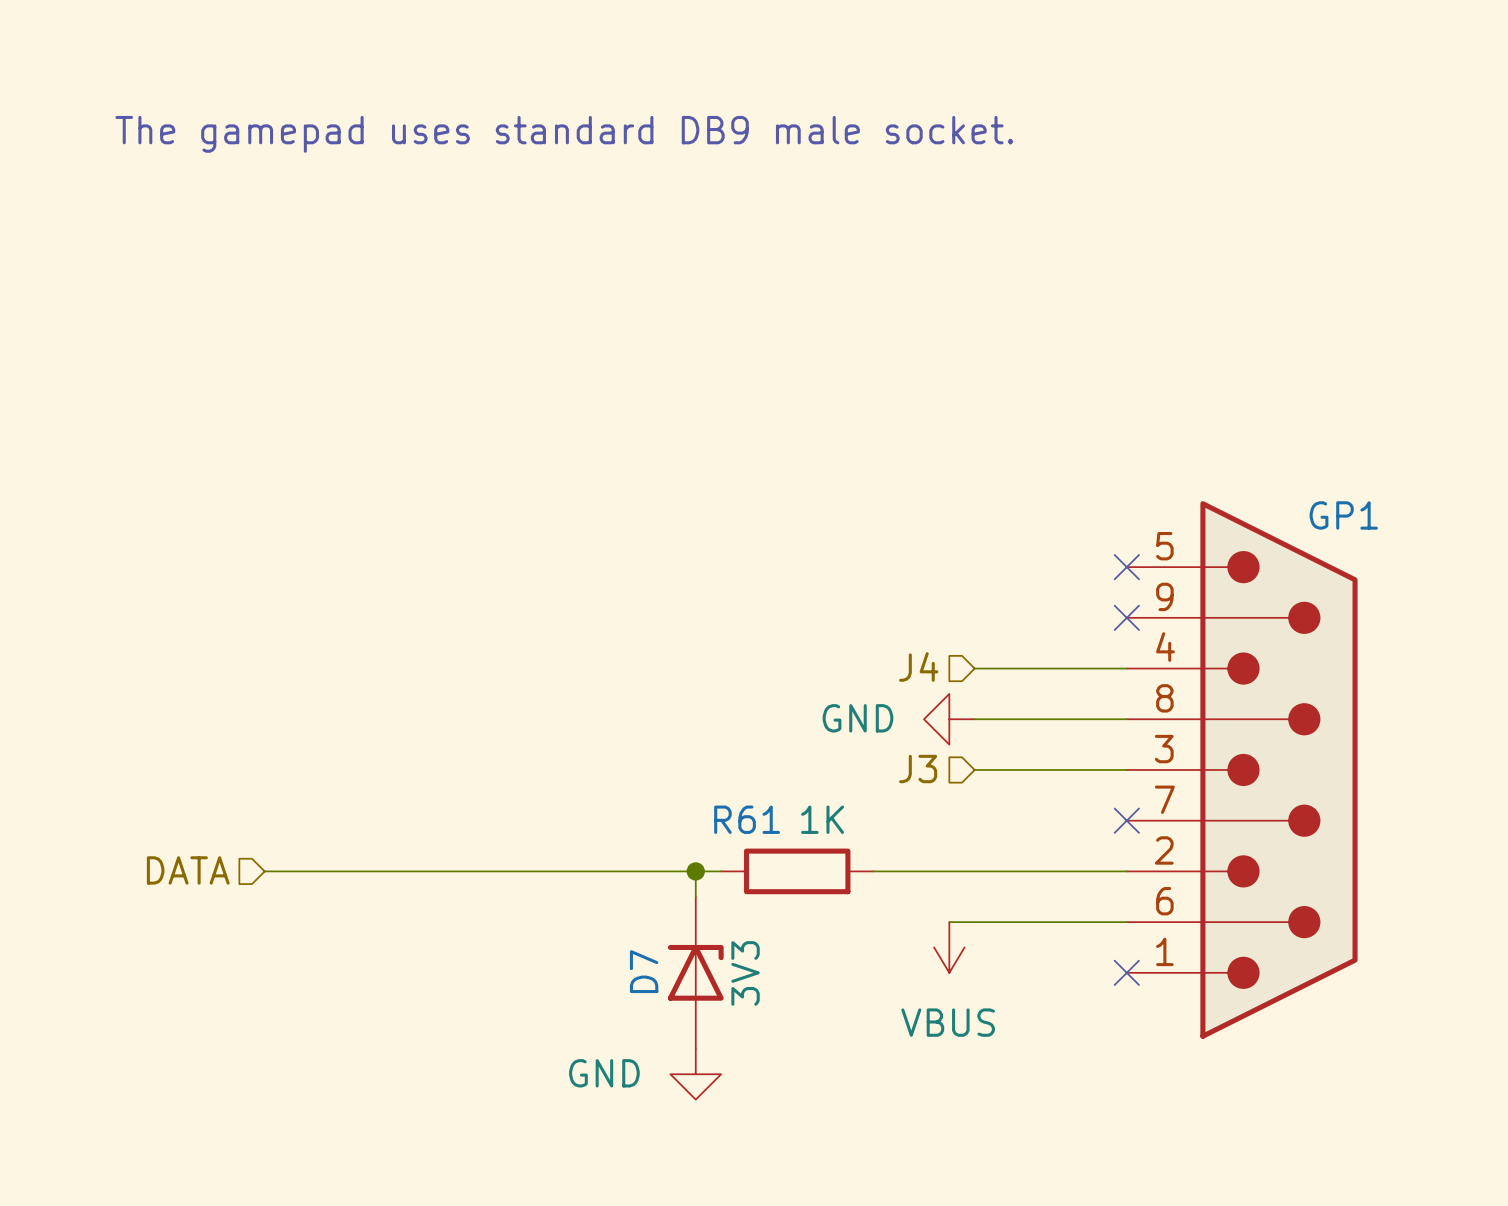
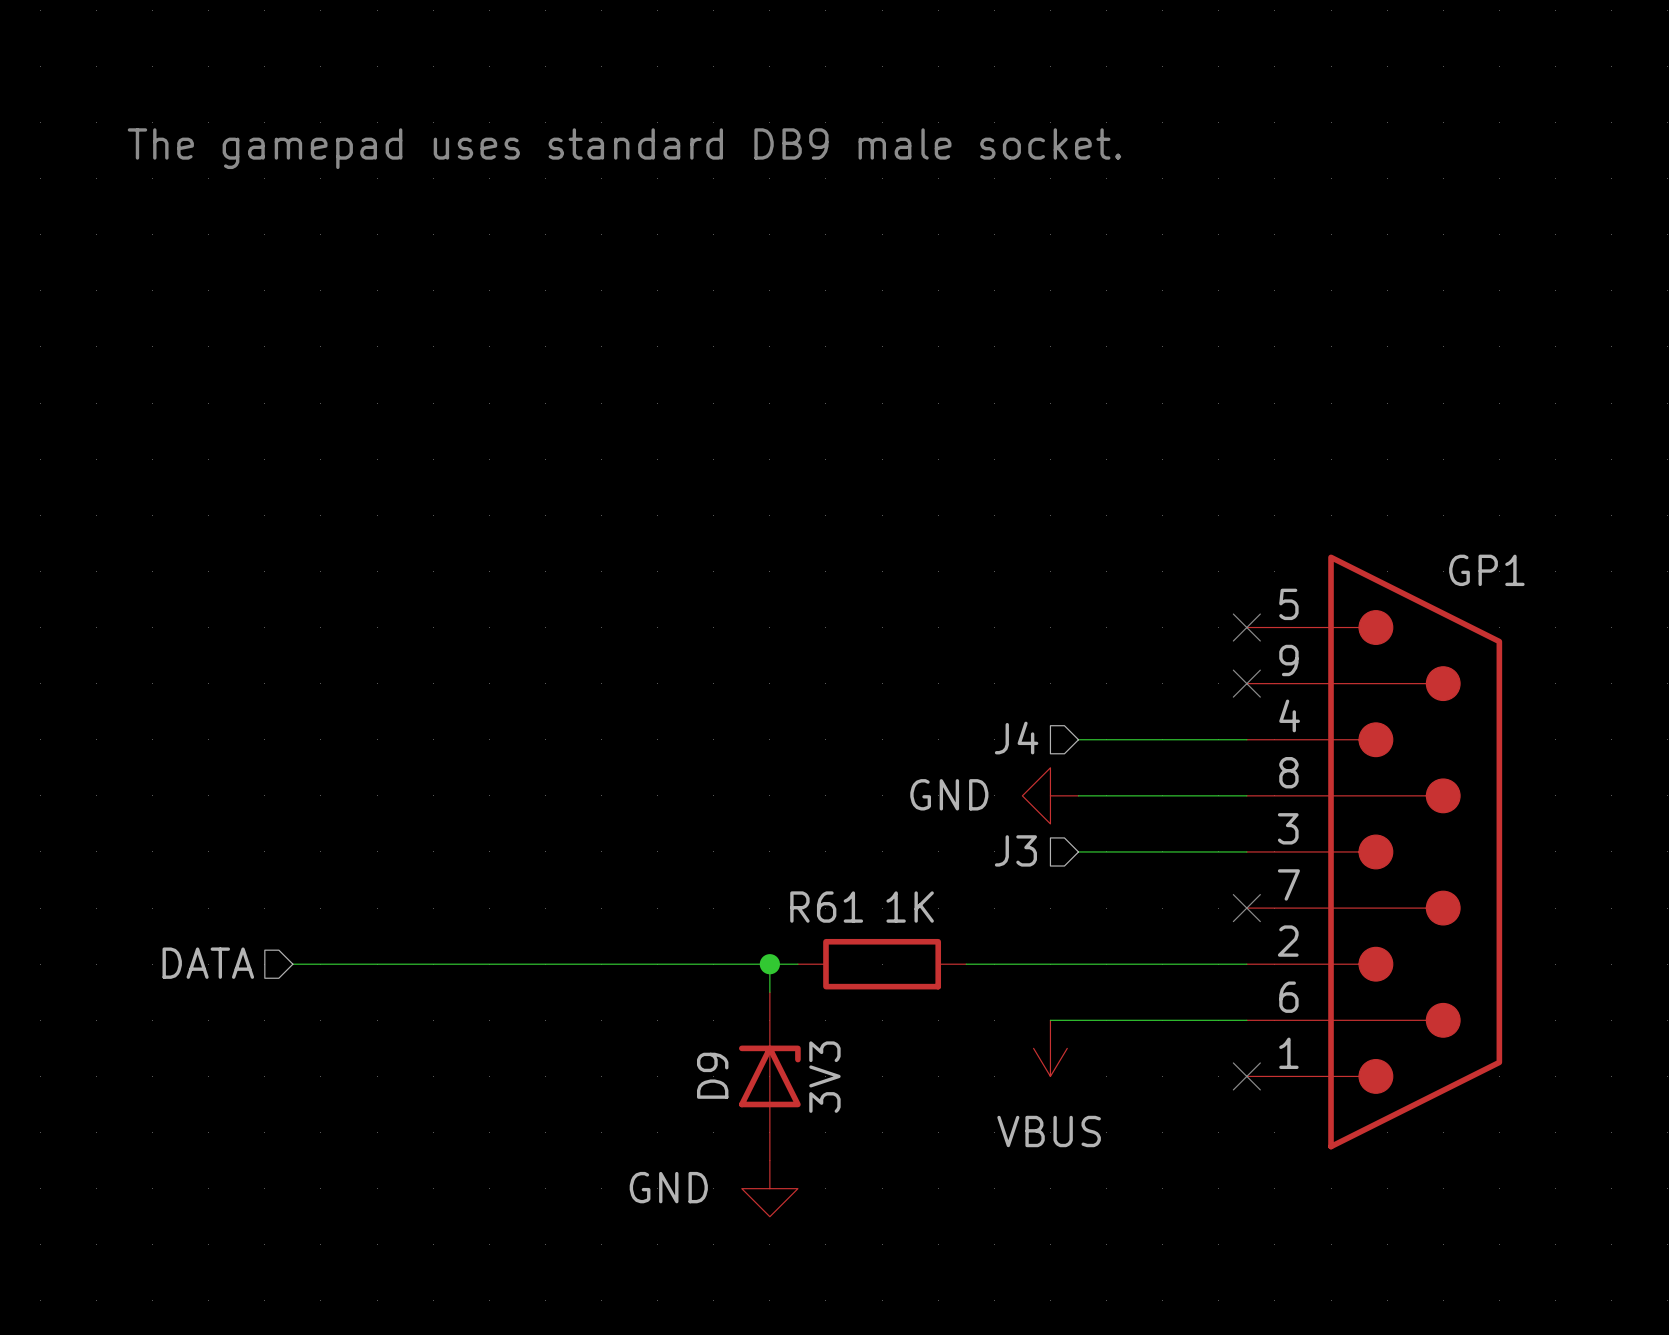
D7 name: D7 (644, 971) -> D9 (712, 1075)

